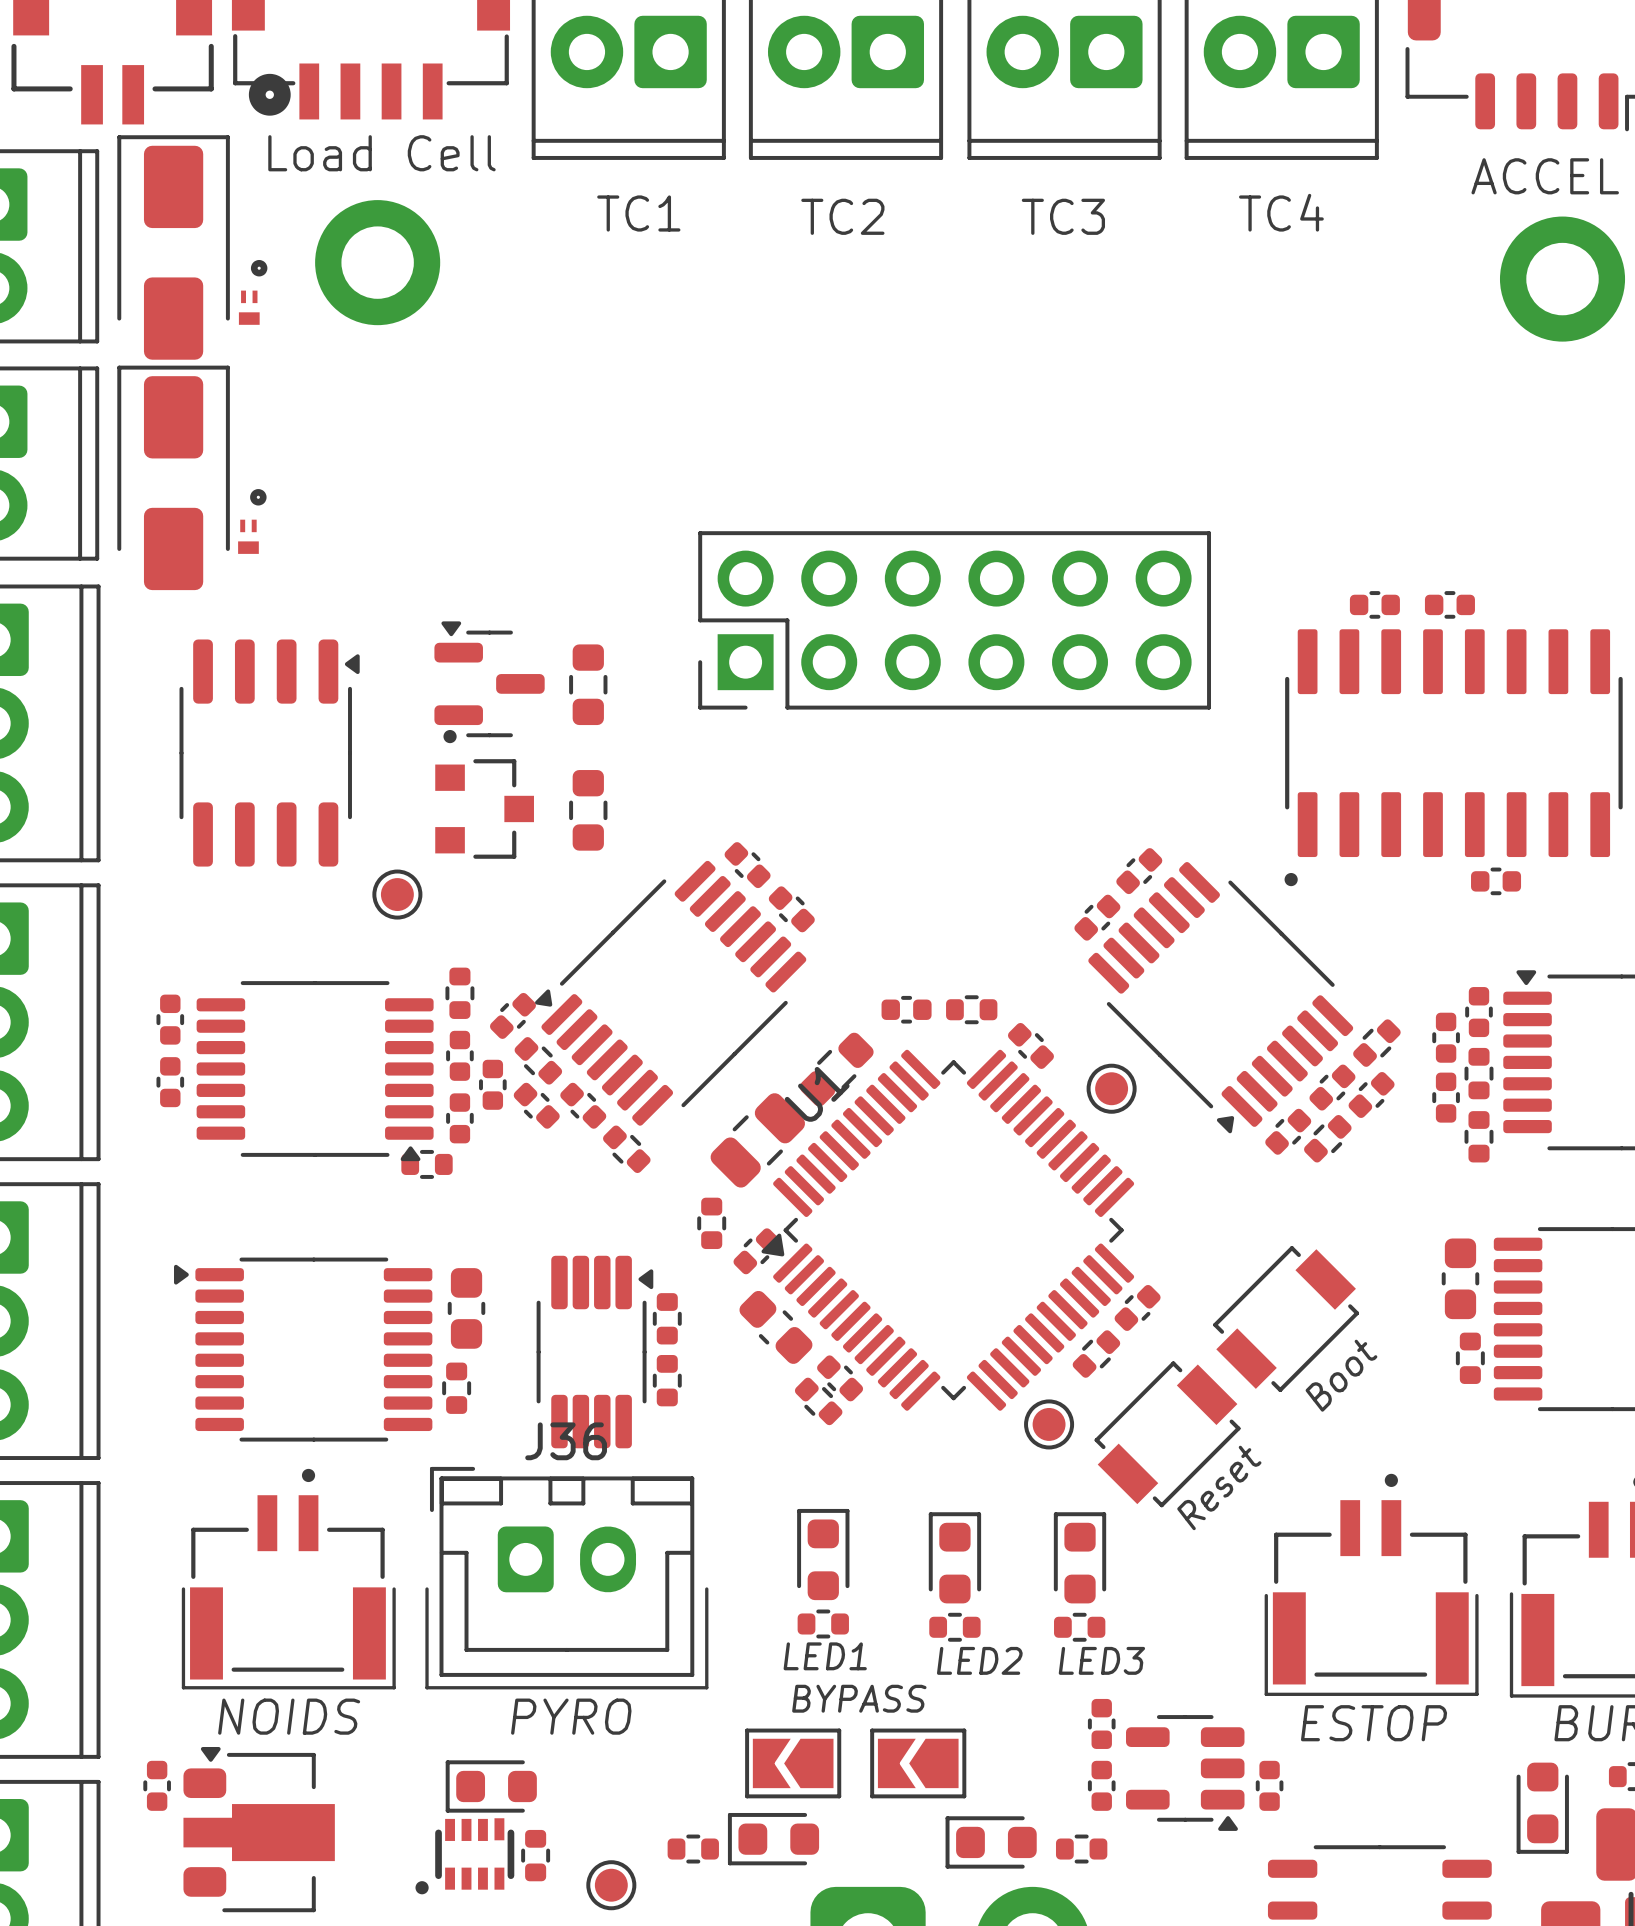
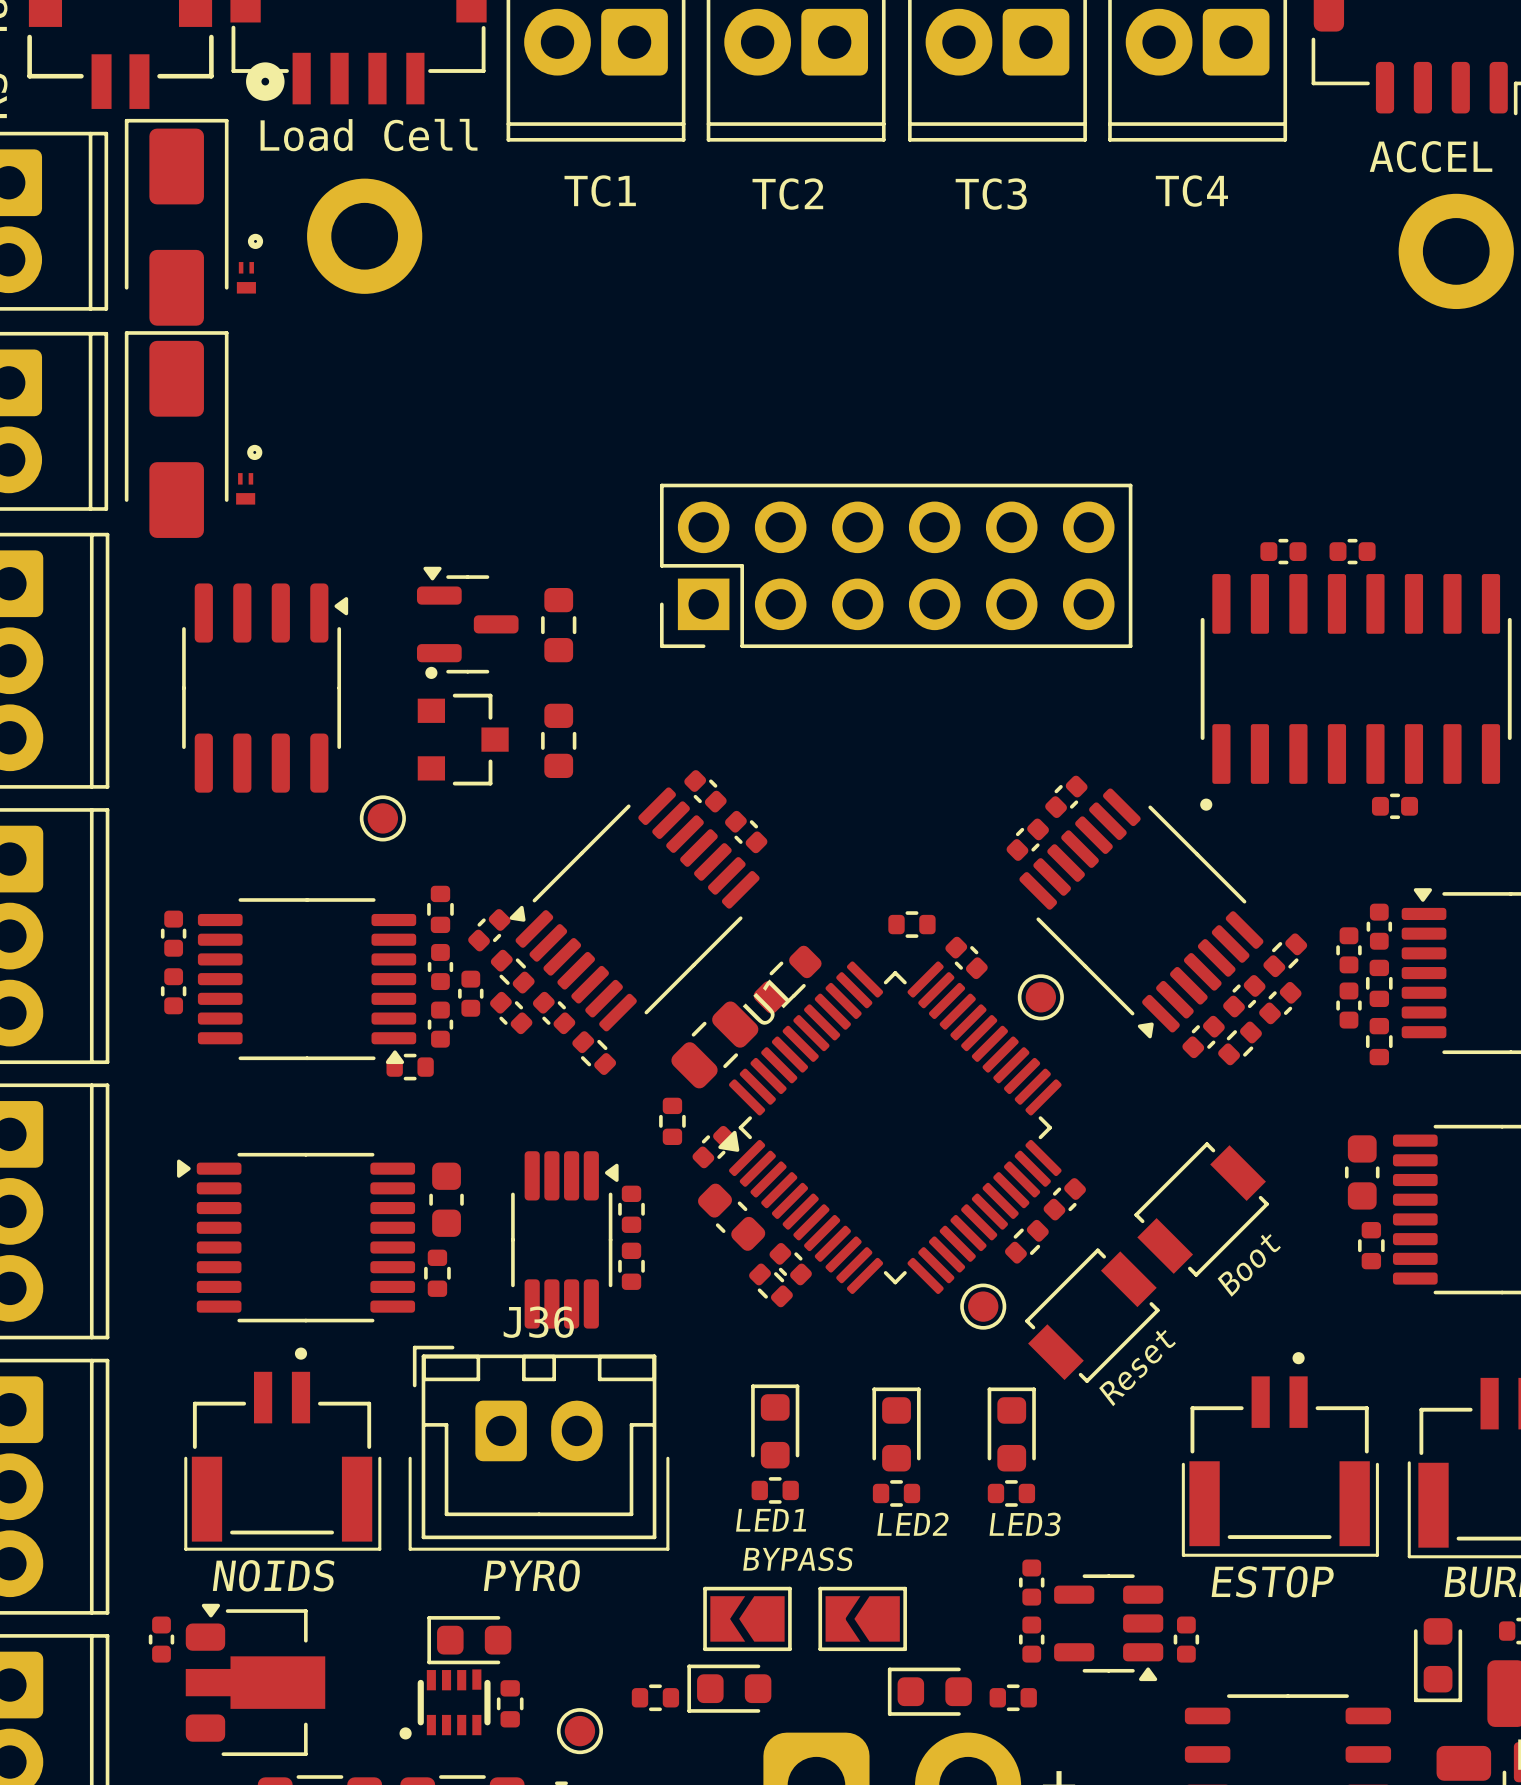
part: (906, 1009) -> none

